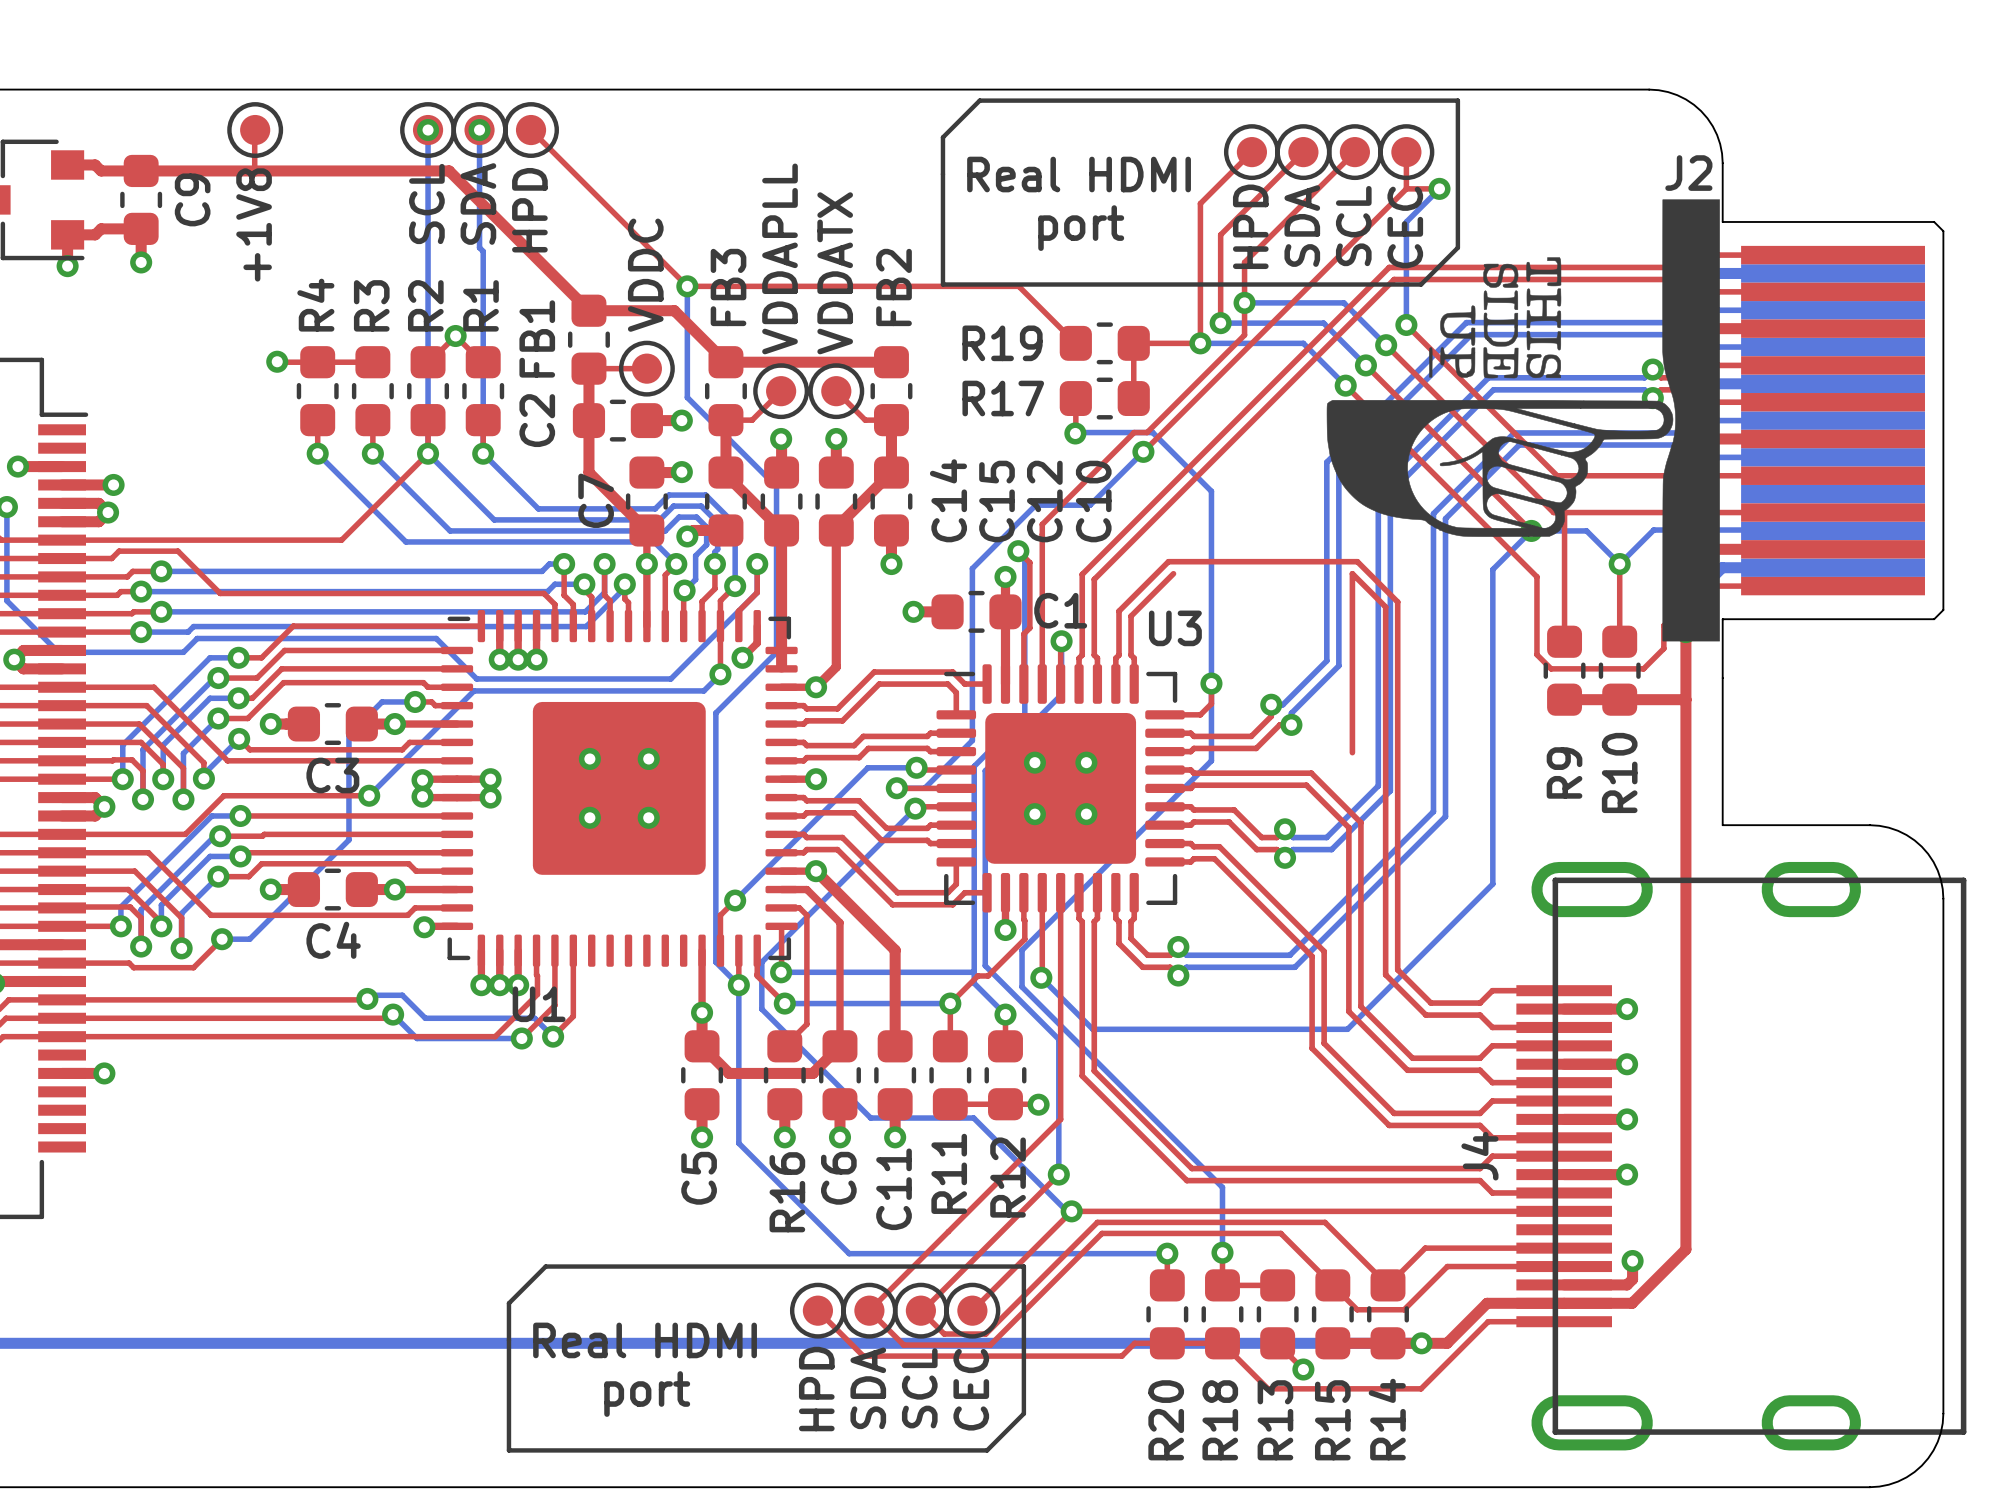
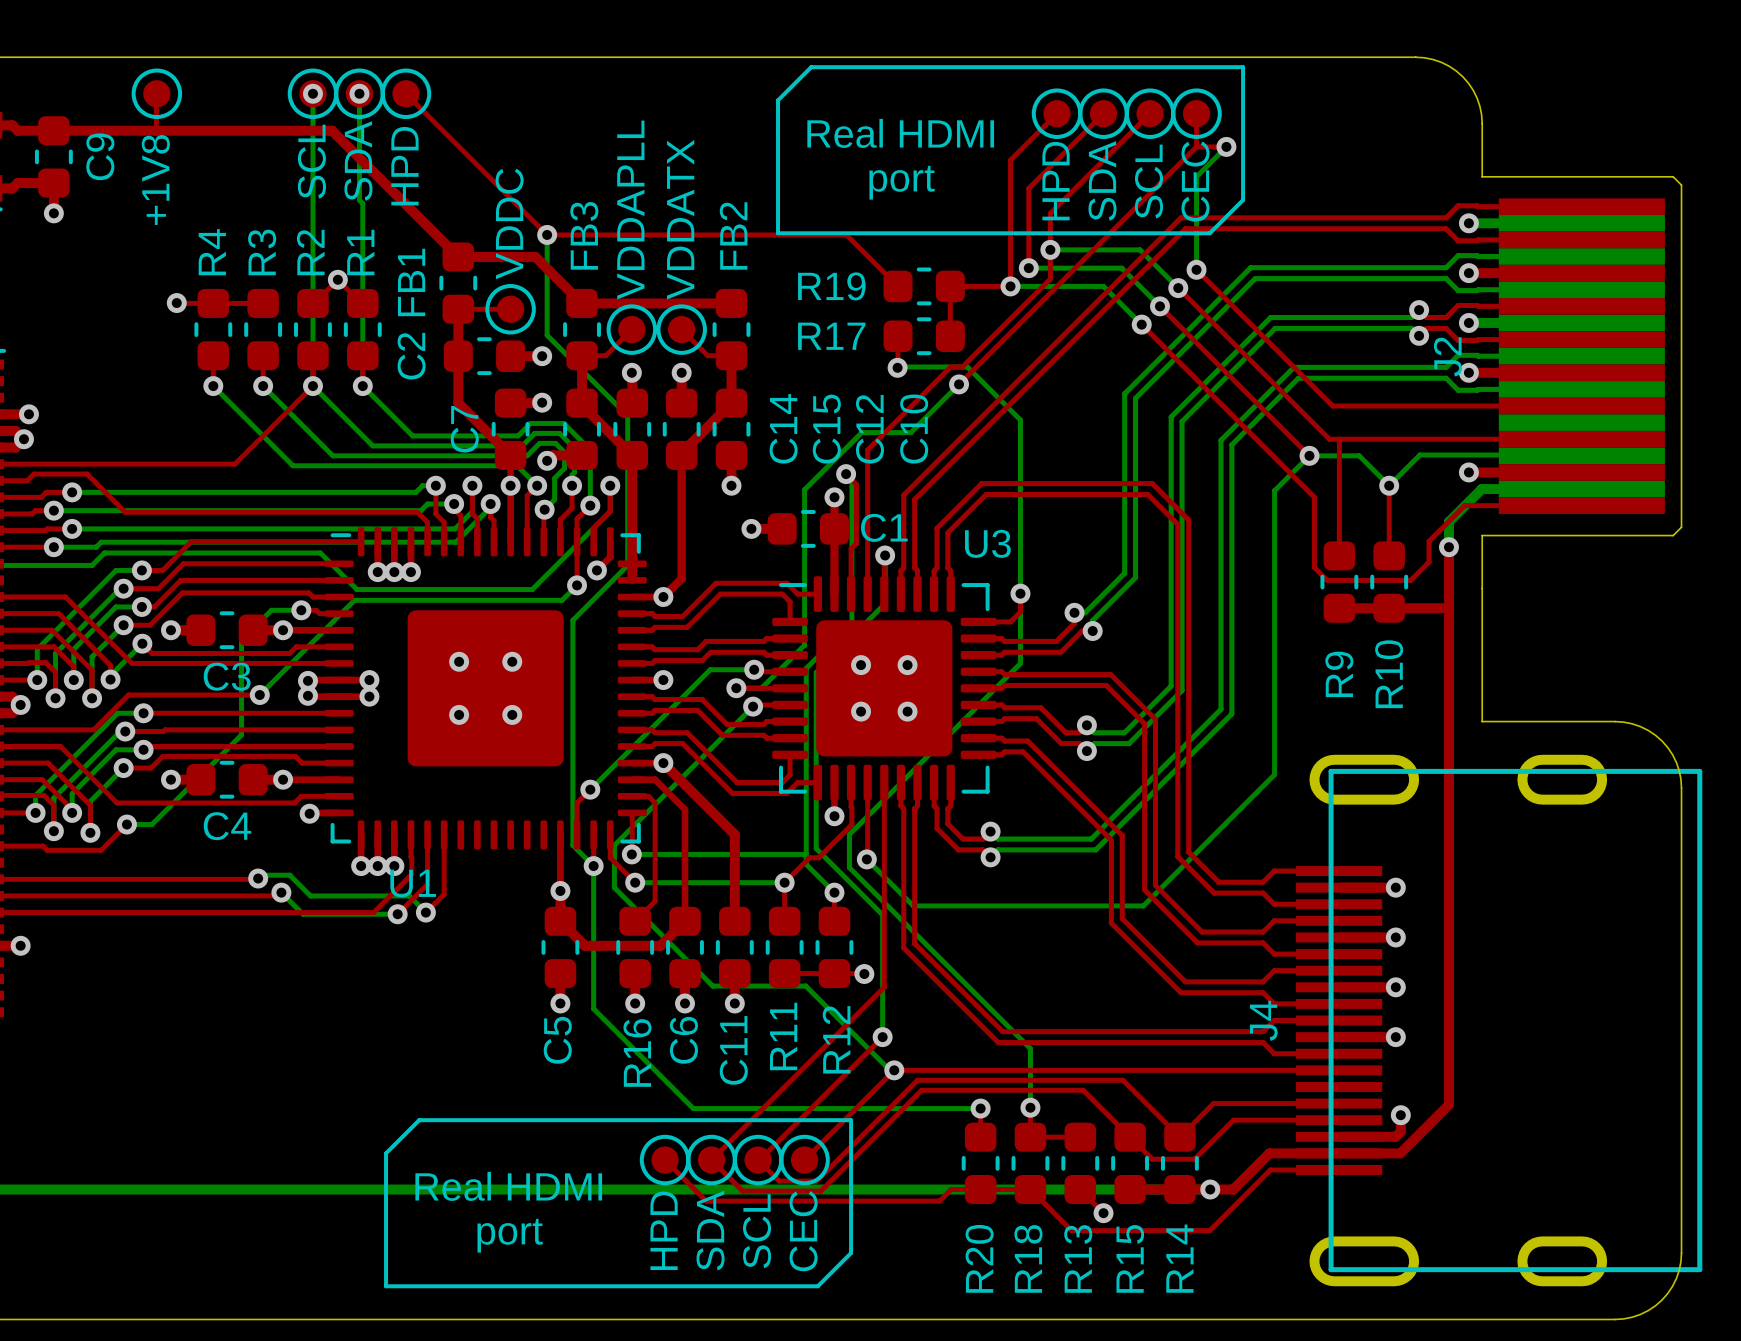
J2 name rotation: 0° (1688, 173) -> 90° counterclockwise (1447, 356)
J2 name position: J2 (1688, 173) -> J2 (1447, 356)
drawing: [1326, 199, 1720, 642] -> none
top track: (1352, 573) (1352, 752) -> (1147, 494) (986, 494)

